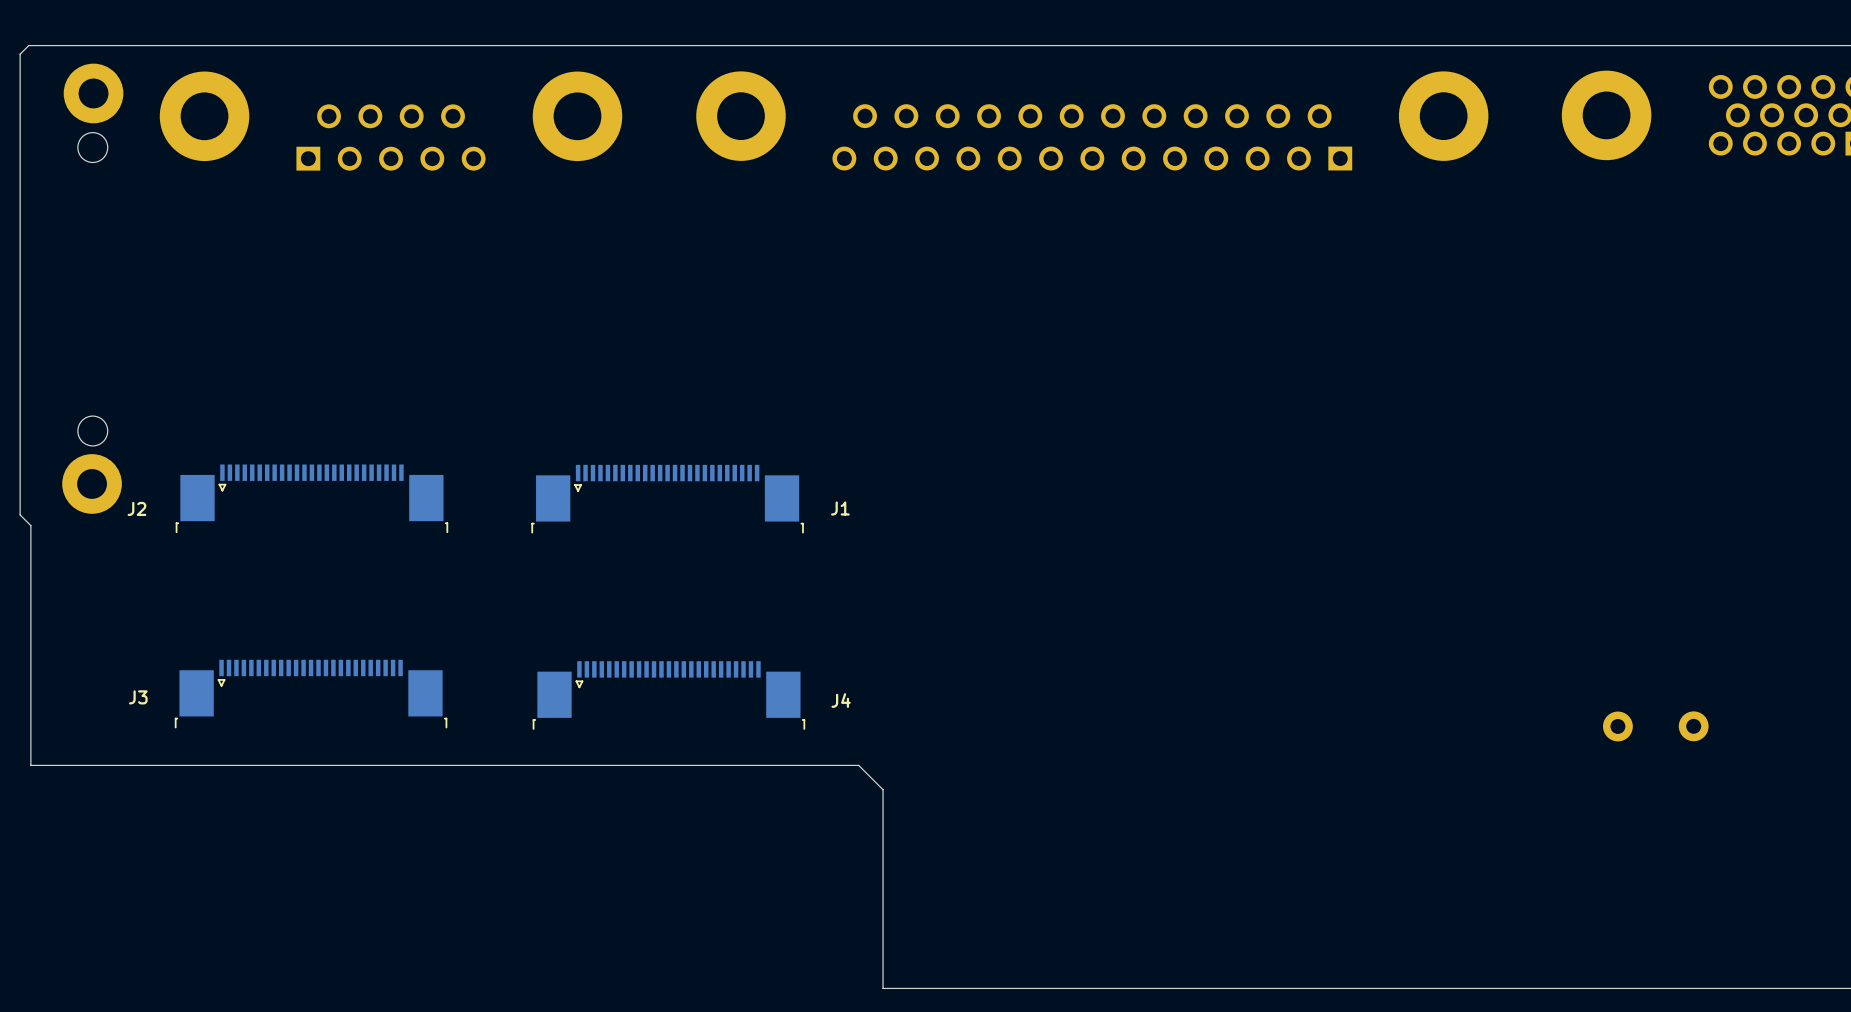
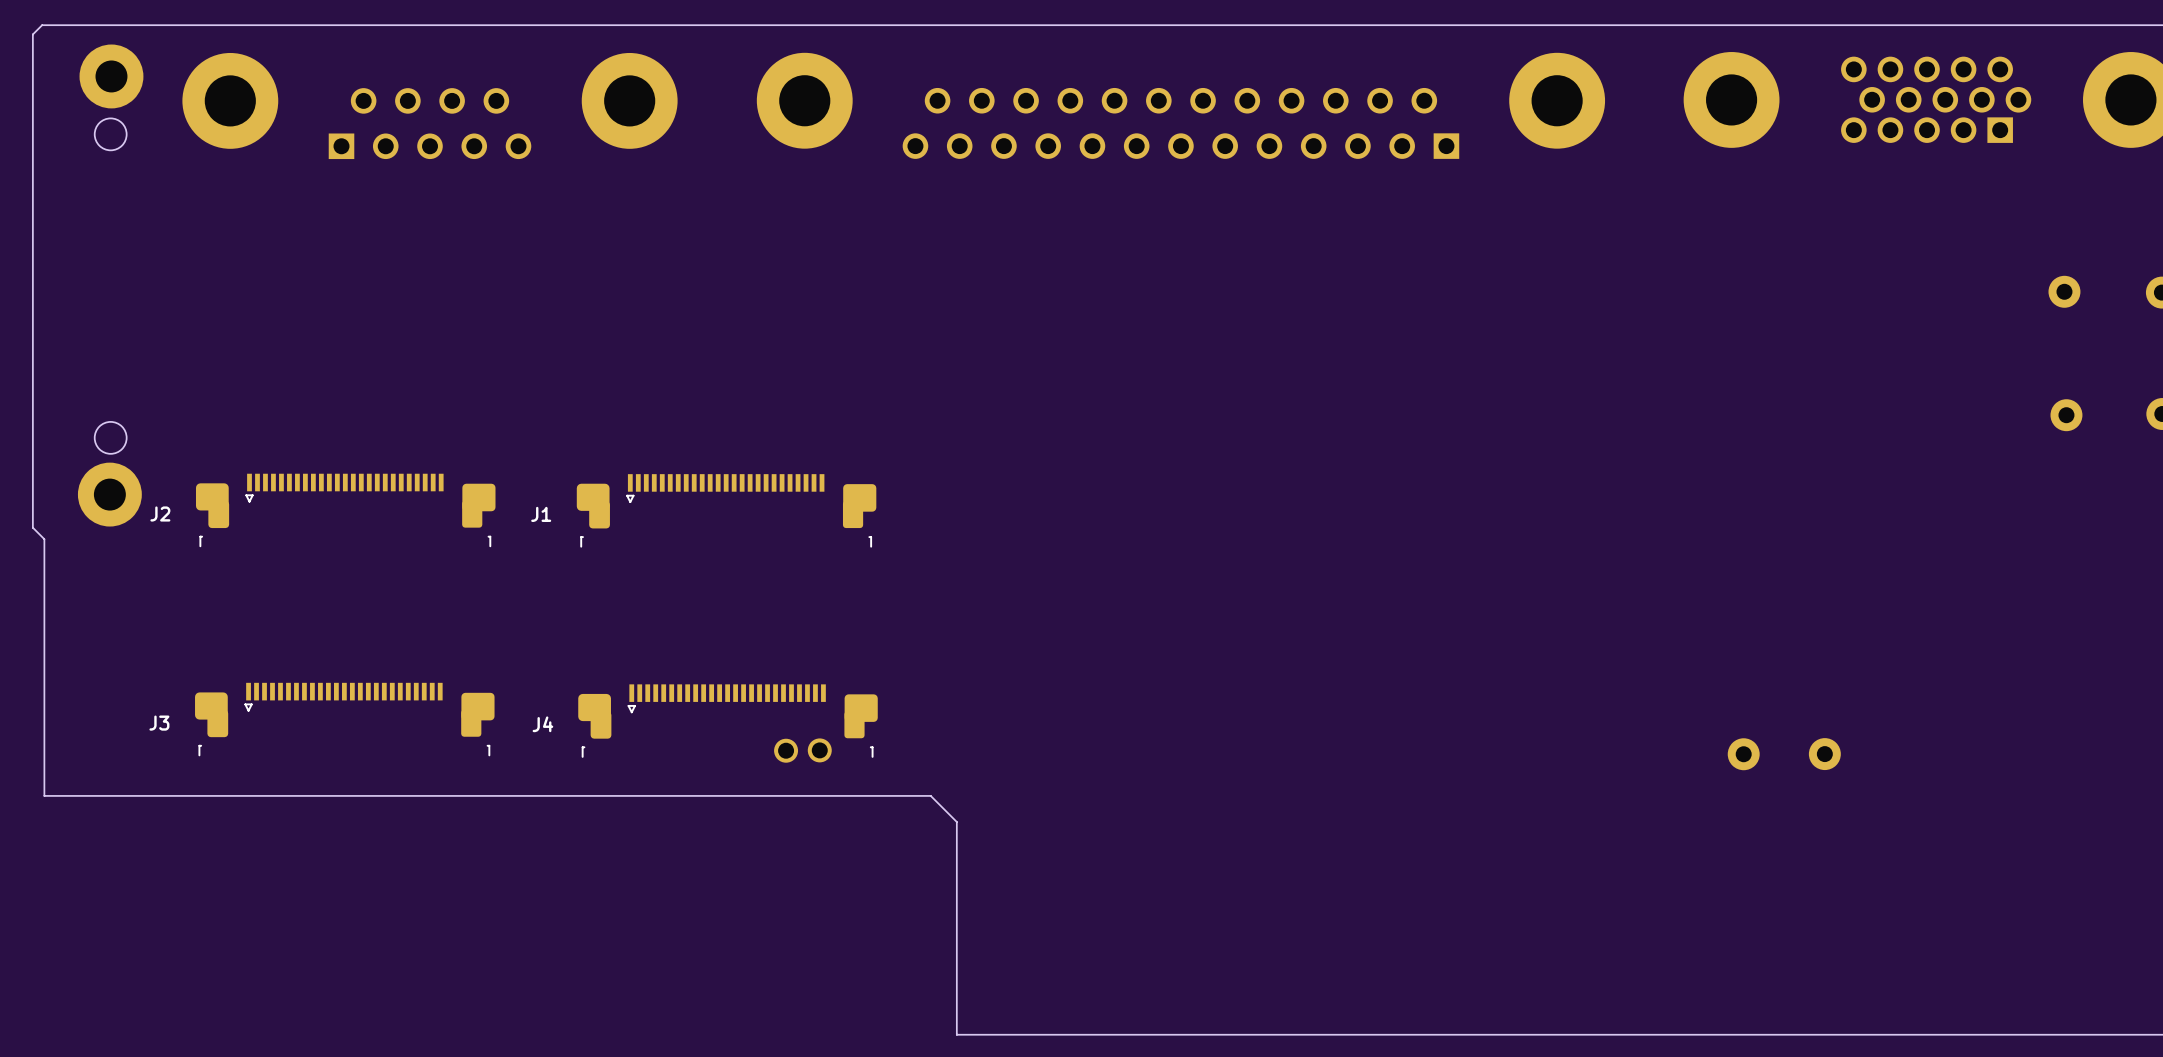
J2 footprint: [175, 464, 449, 534] -> [195, 473, 496, 548]
J1 footprint: [531, 464, 804, 534] -> [576, 474, 877, 548]
J1 name position: J1 (840, 508) -> J1 (541, 514)
J3 footprint: [174, 659, 448, 729] -> [195, 682, 495, 757]
J4 footprint: [532, 661, 806, 730] -> [578, 684, 878, 758]
J4 name position: J4 (841, 700) -> J4 (542, 724)
part: none -> (819, 750)
part: none -> (786, 750)

